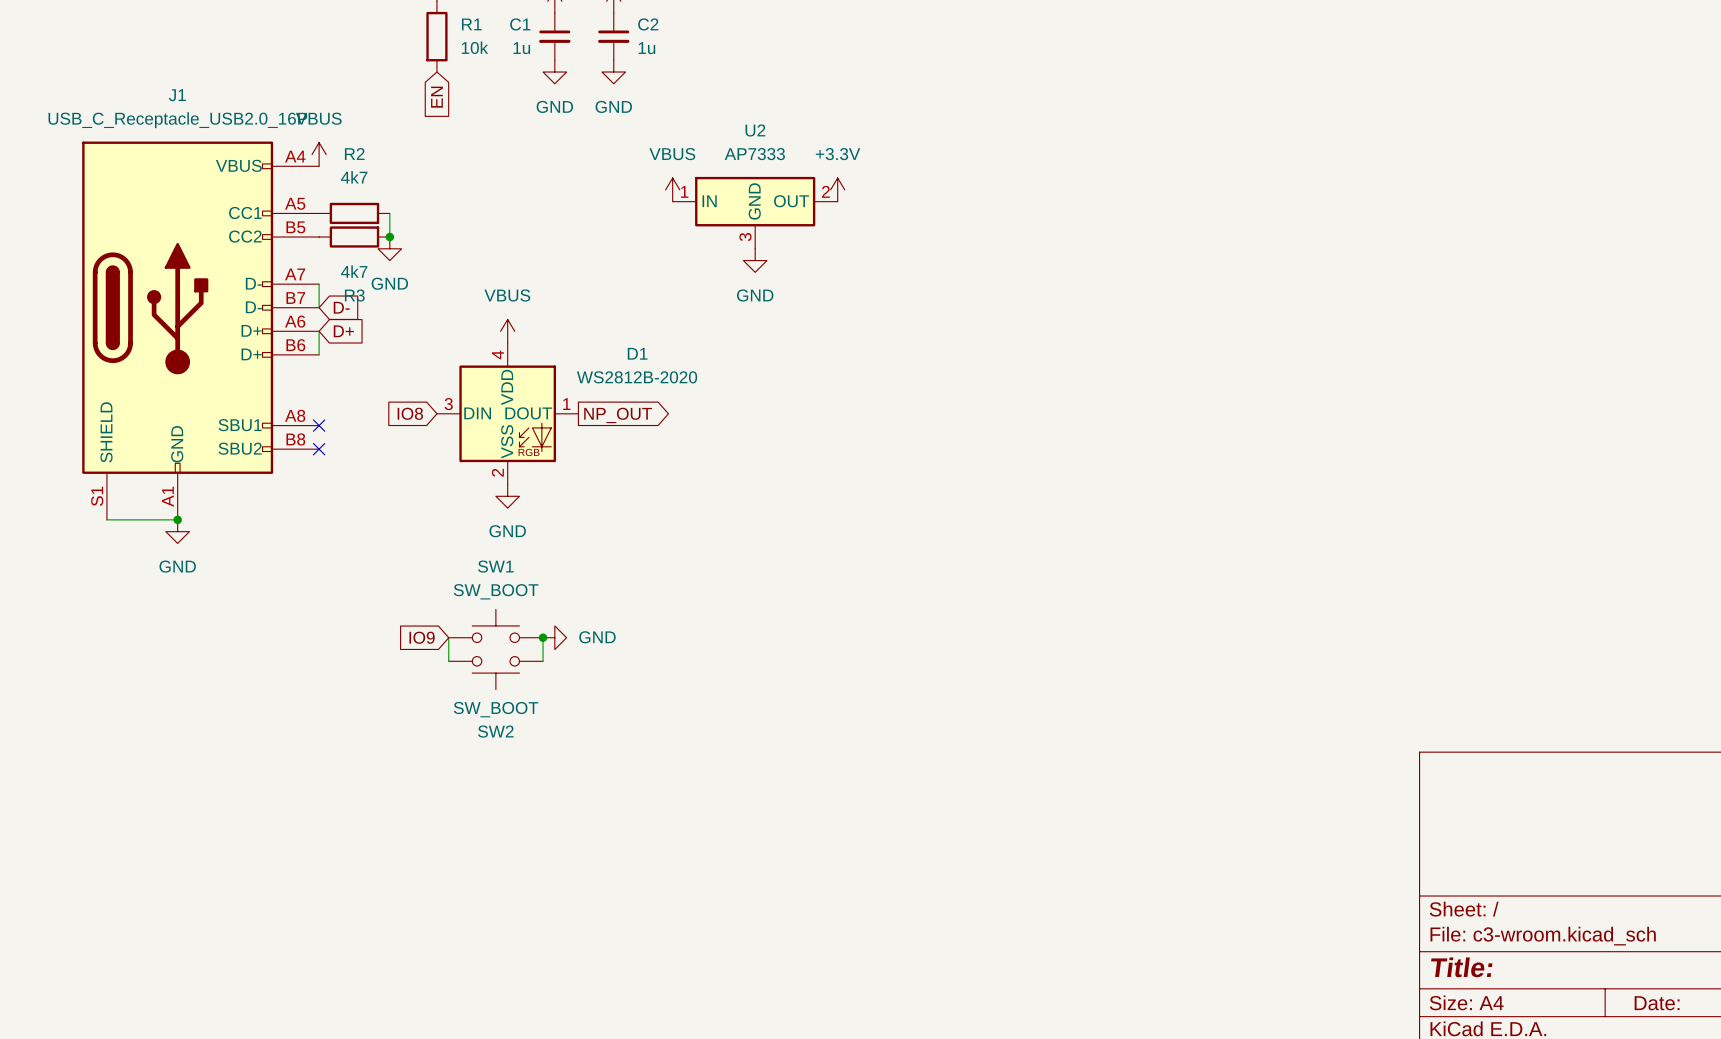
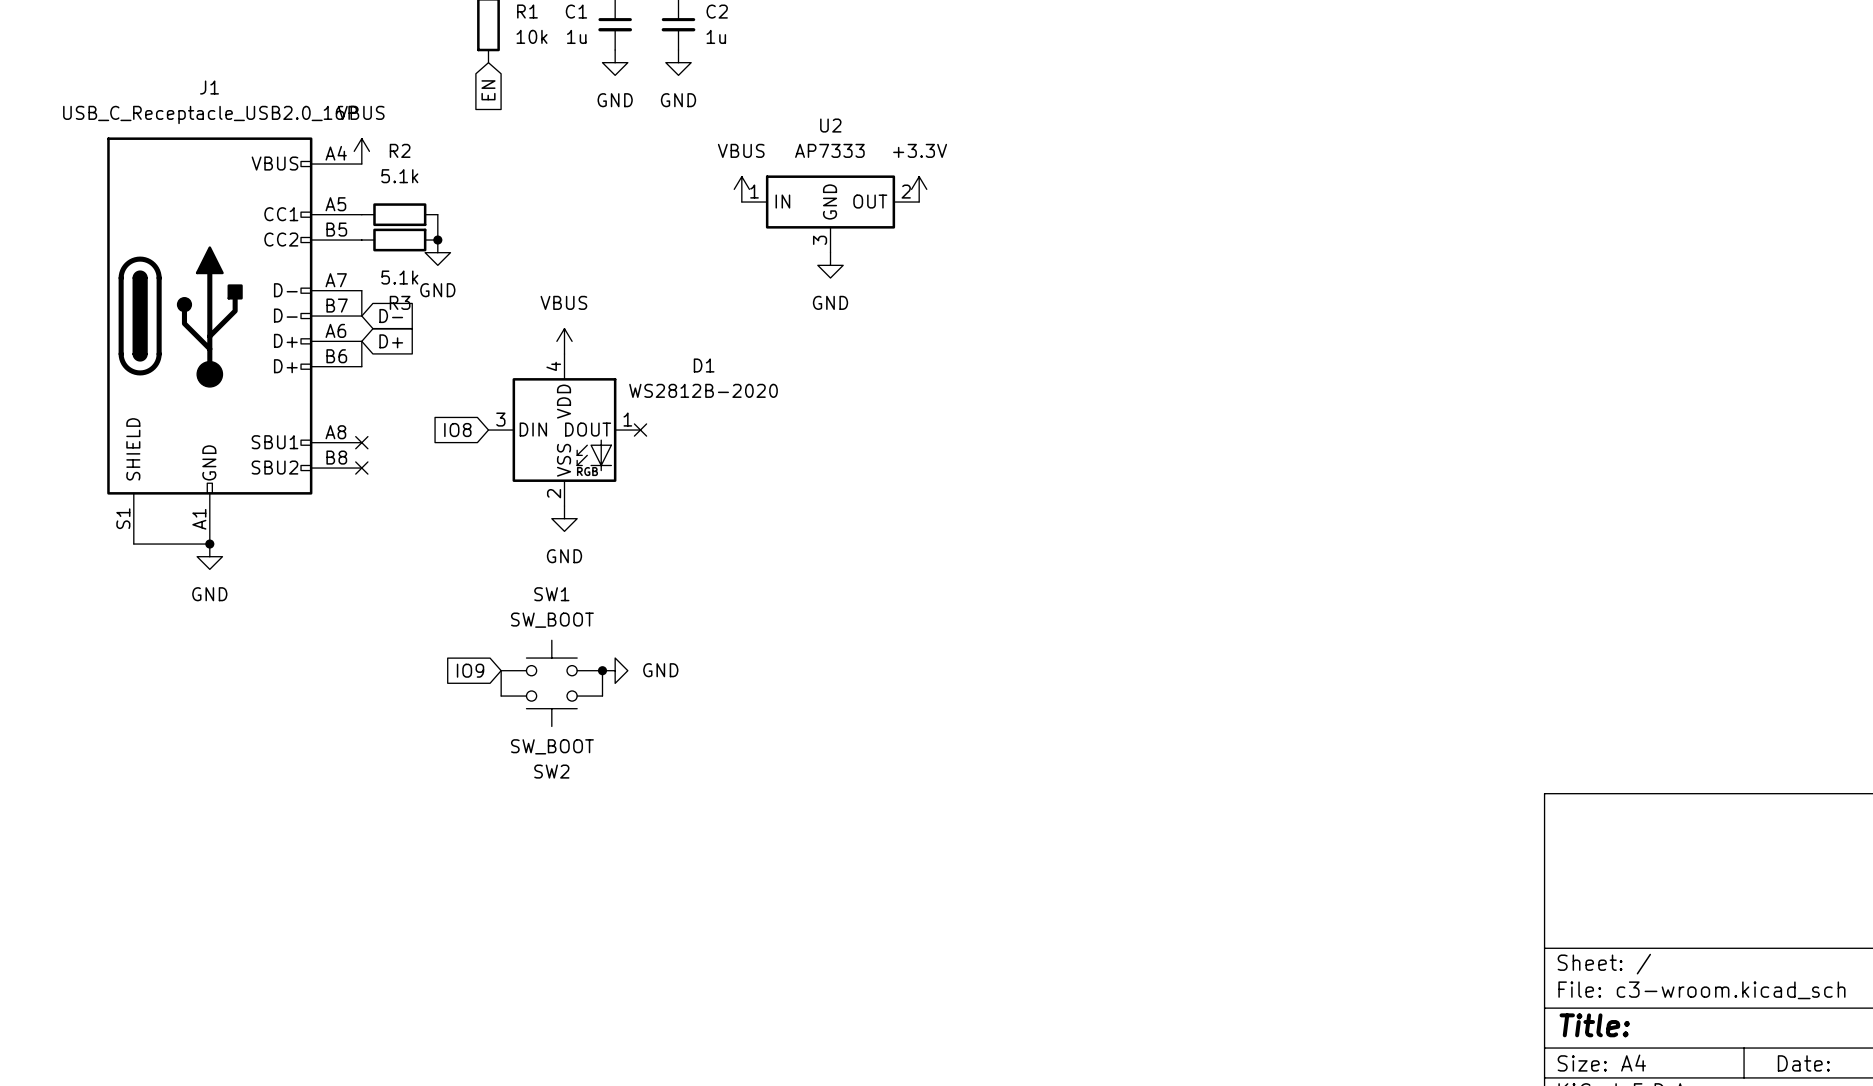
R2 value: 4k7 (354, 177) -> 5.1k (399, 176)
R3 value: 4k7 (354, 271) -> 5.1k (399, 277)
no-connect mark: none -> (640, 430)
global label: NP_OUT (618, 415) -> none

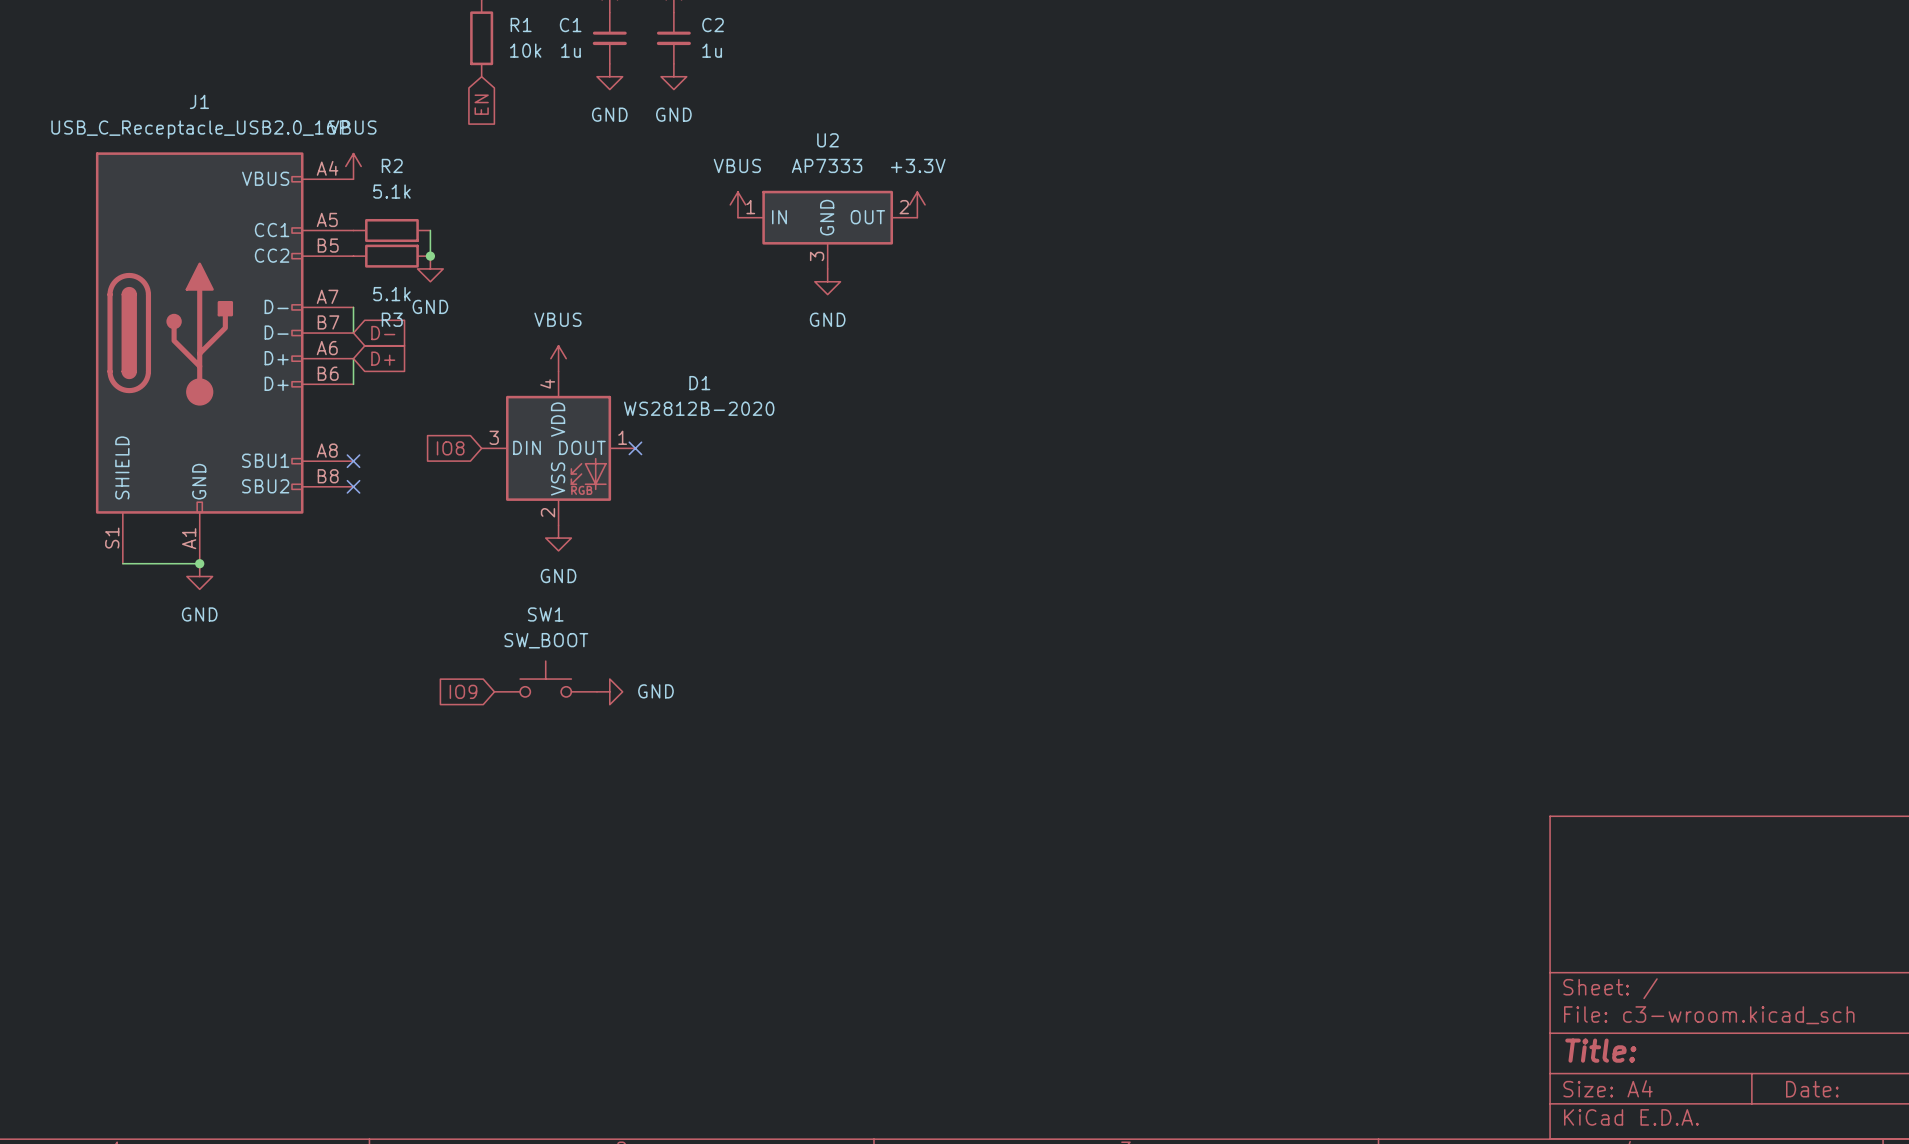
wire: (501, 670) (501, 696) -> none
wire: (602, 670) (602, 696) -> none
junction: (602, 670) -> none
SW2: SW_BOOT (551, 708) -> none

